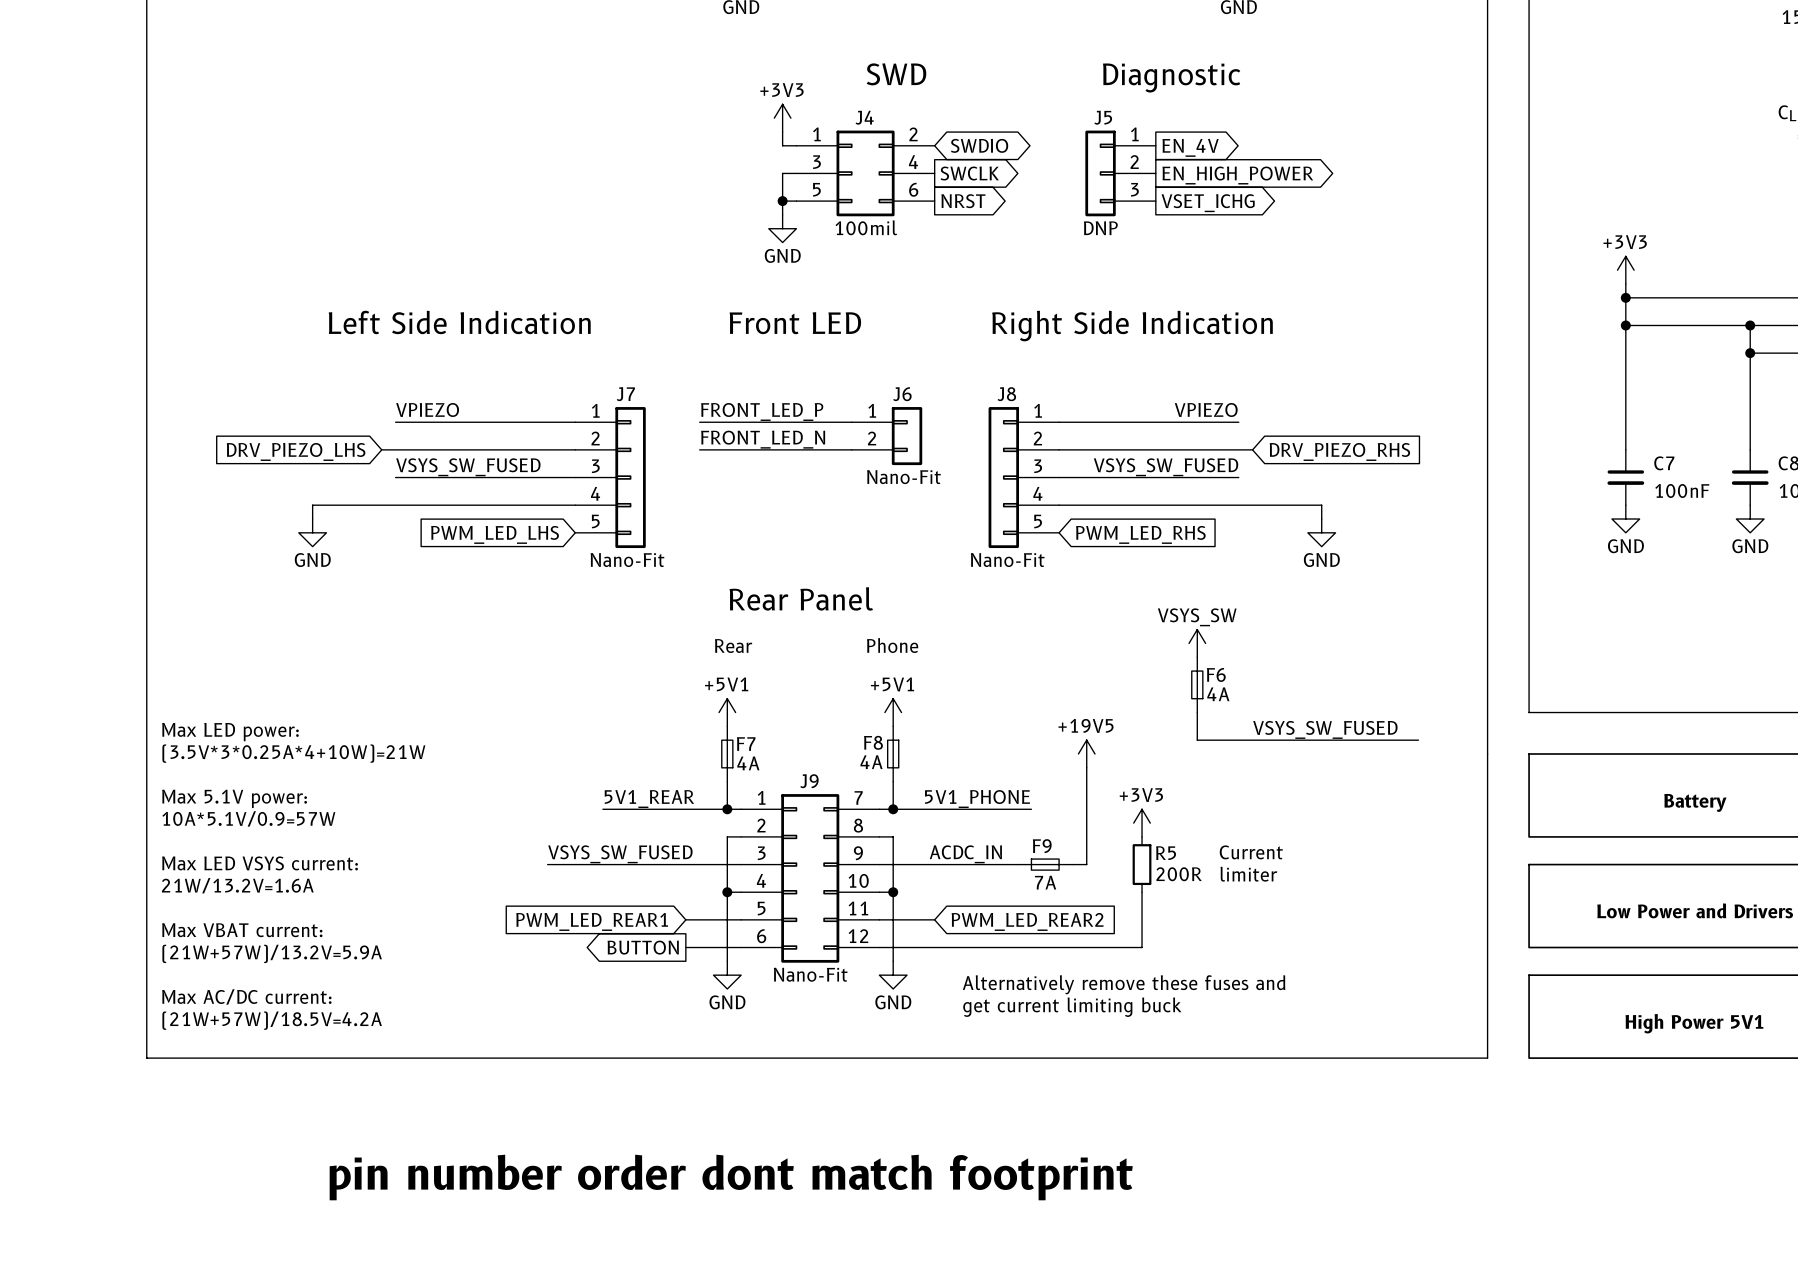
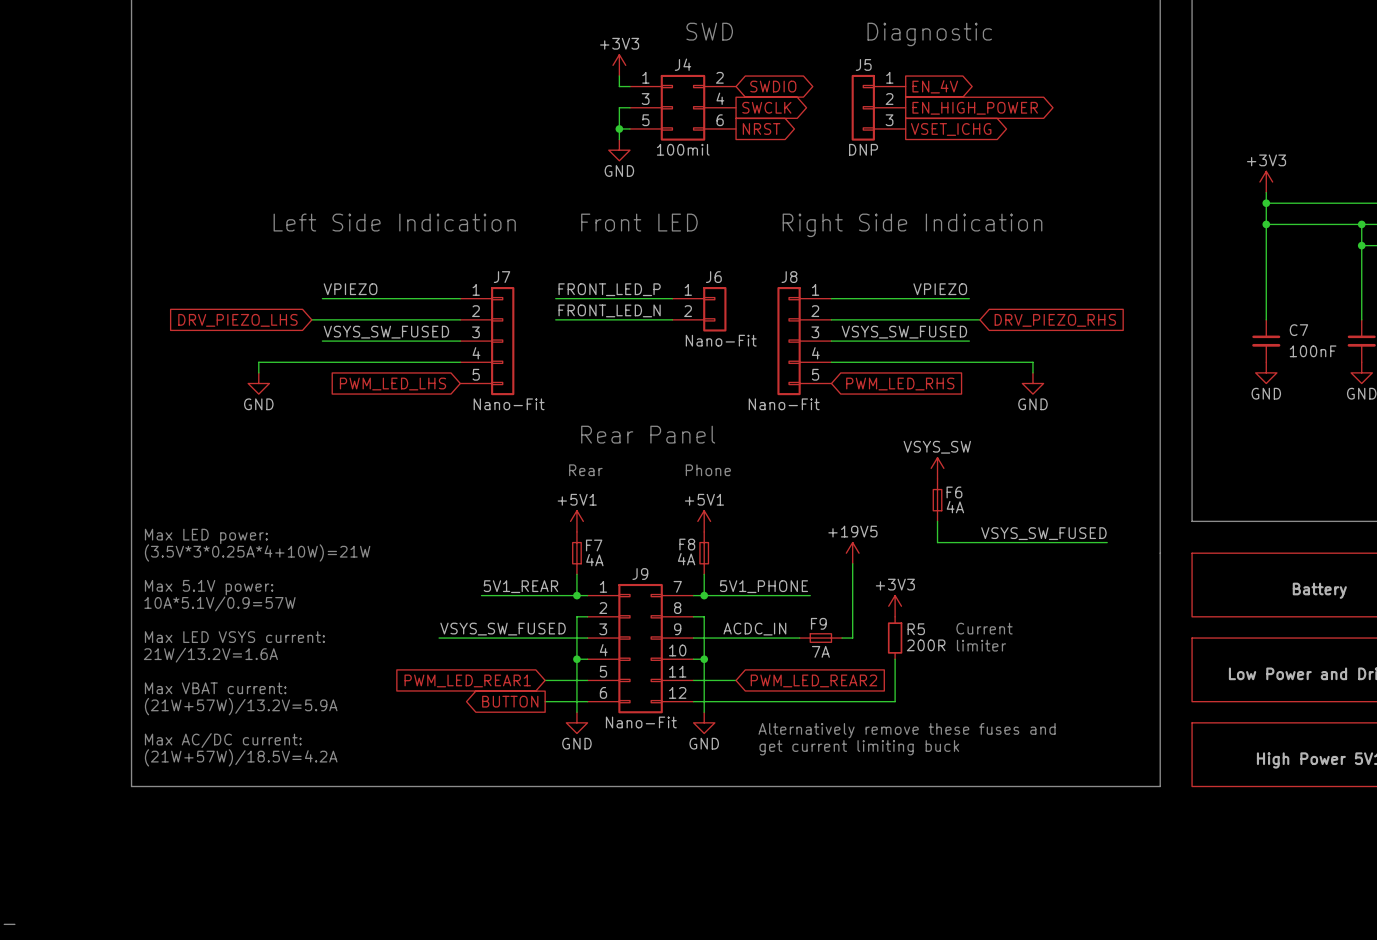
text: pin number order dont match footprint (731, 1177) -> none

